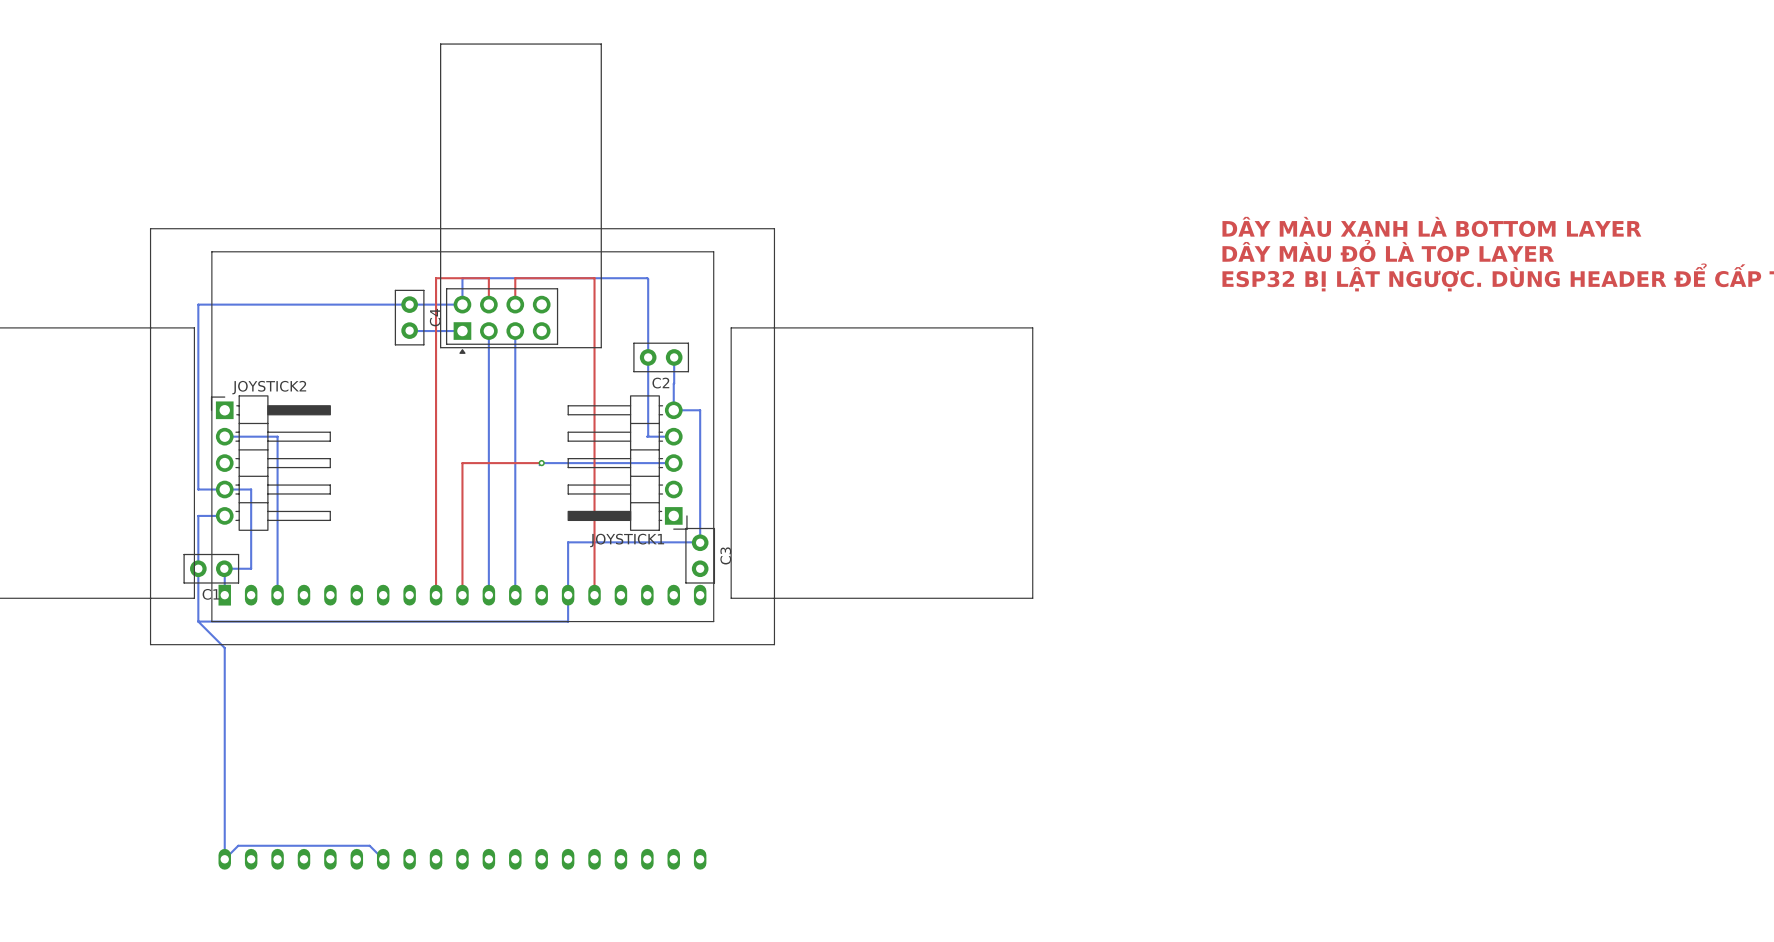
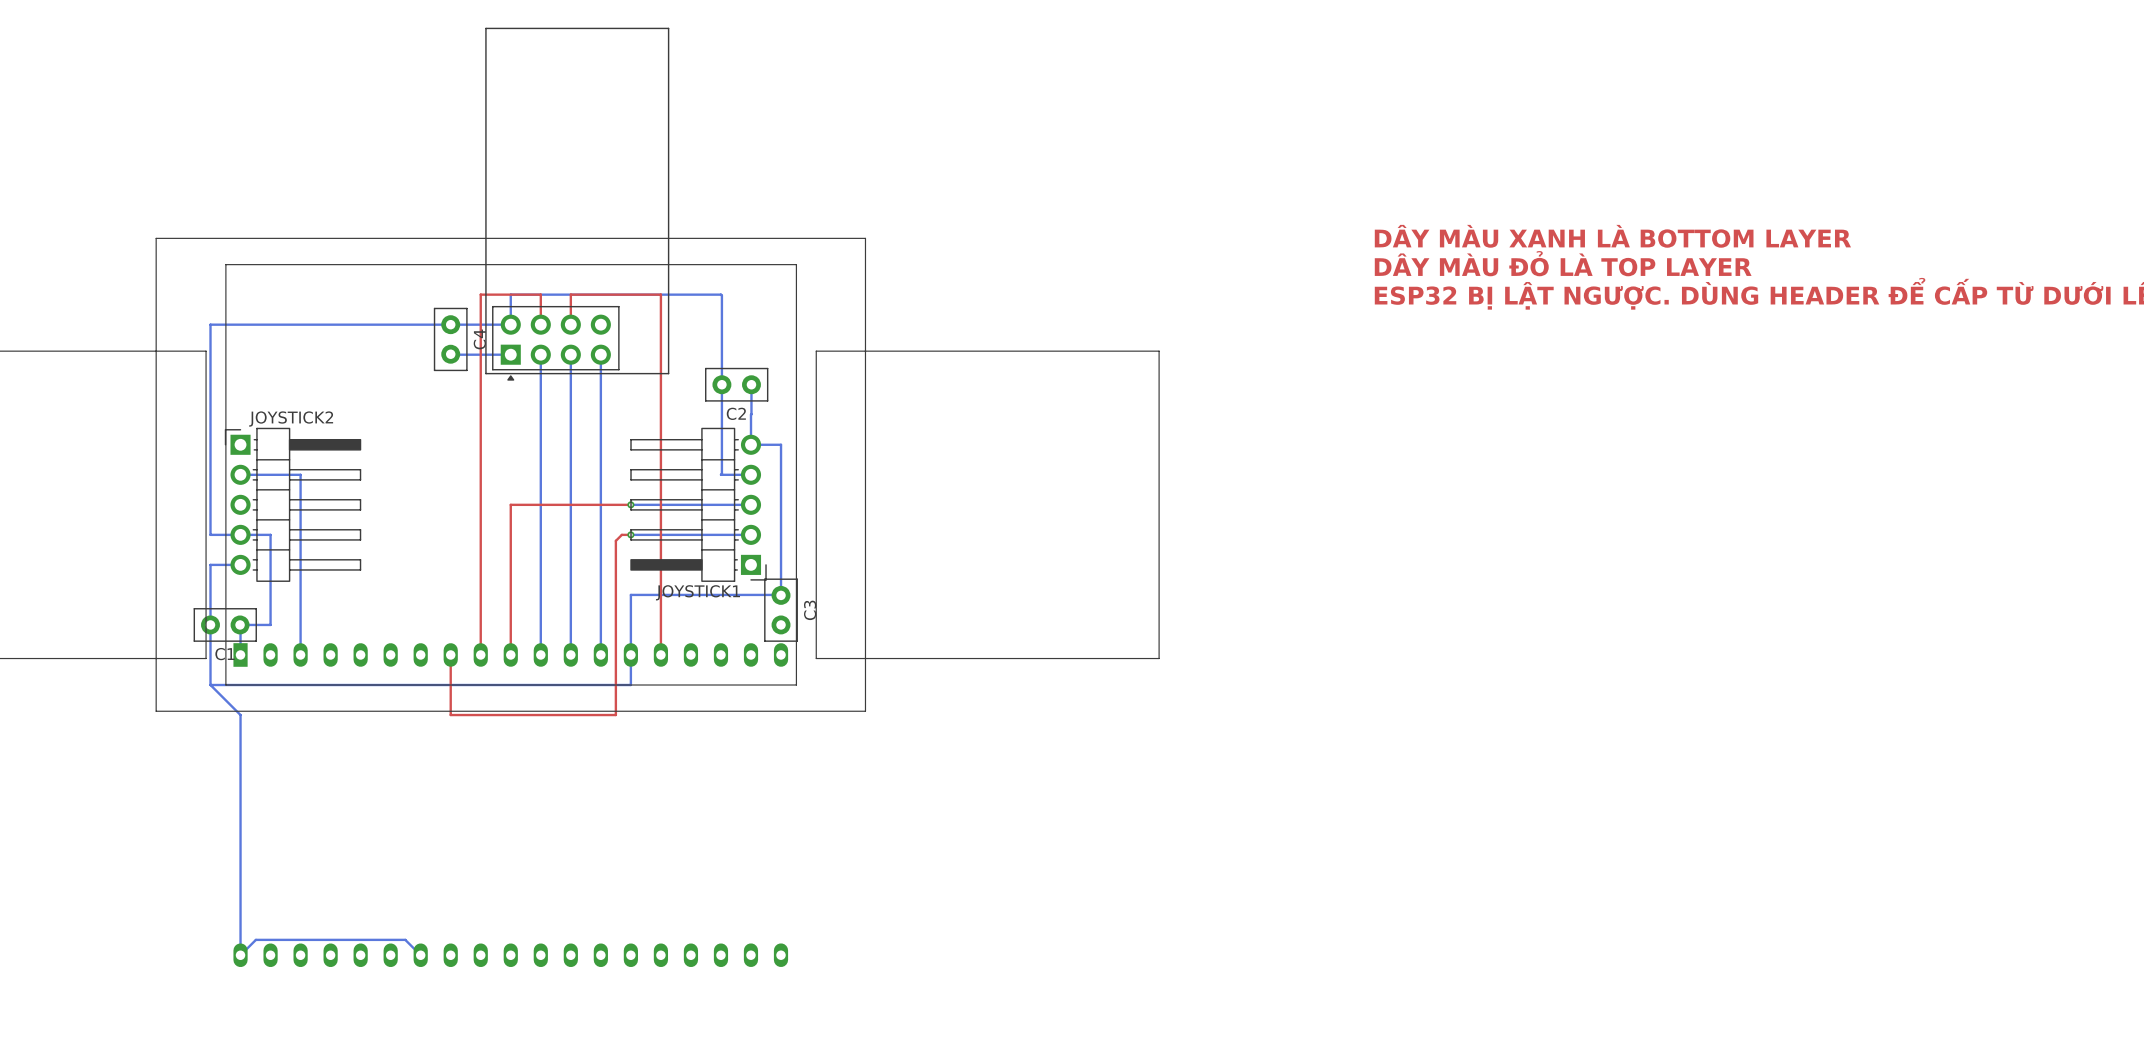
bottom track: none -> (600, 354) (600, 654)
top track: none -> (600, 504) (630, 504)
via: (541, 463) -> none
bottom track: (568, 463) (541, 463) (539, 465) -> none
via: none -> (630, 504)
bottom track: none -> (630, 534) (750, 534)
top track: none -> (630, 534) (621, 534) (615, 540) (615, 715) (450, 715) (450, 654)
via: none -> (630, 534)

